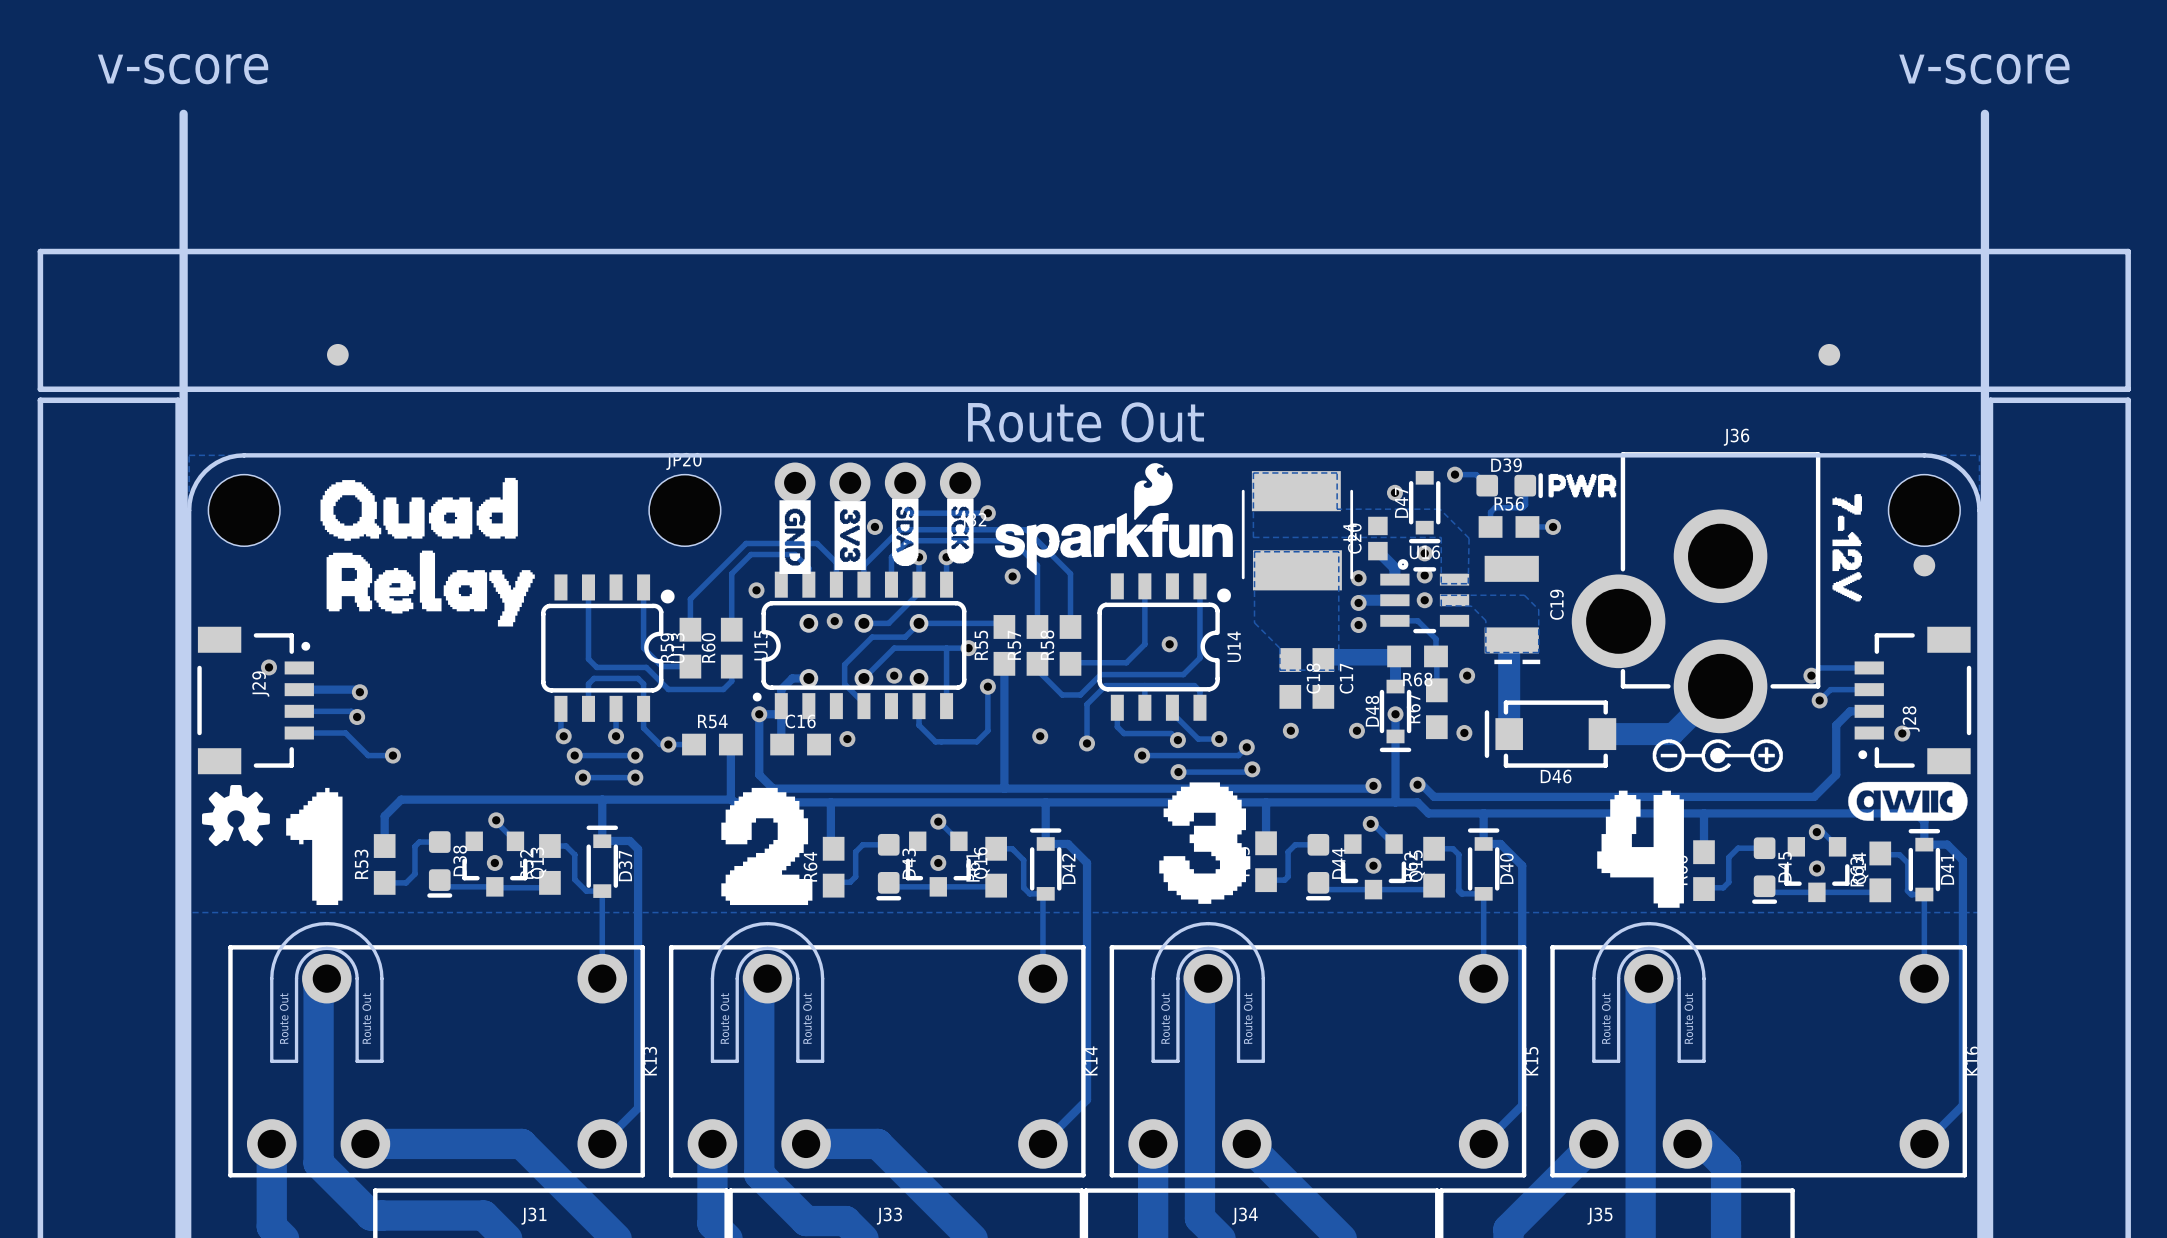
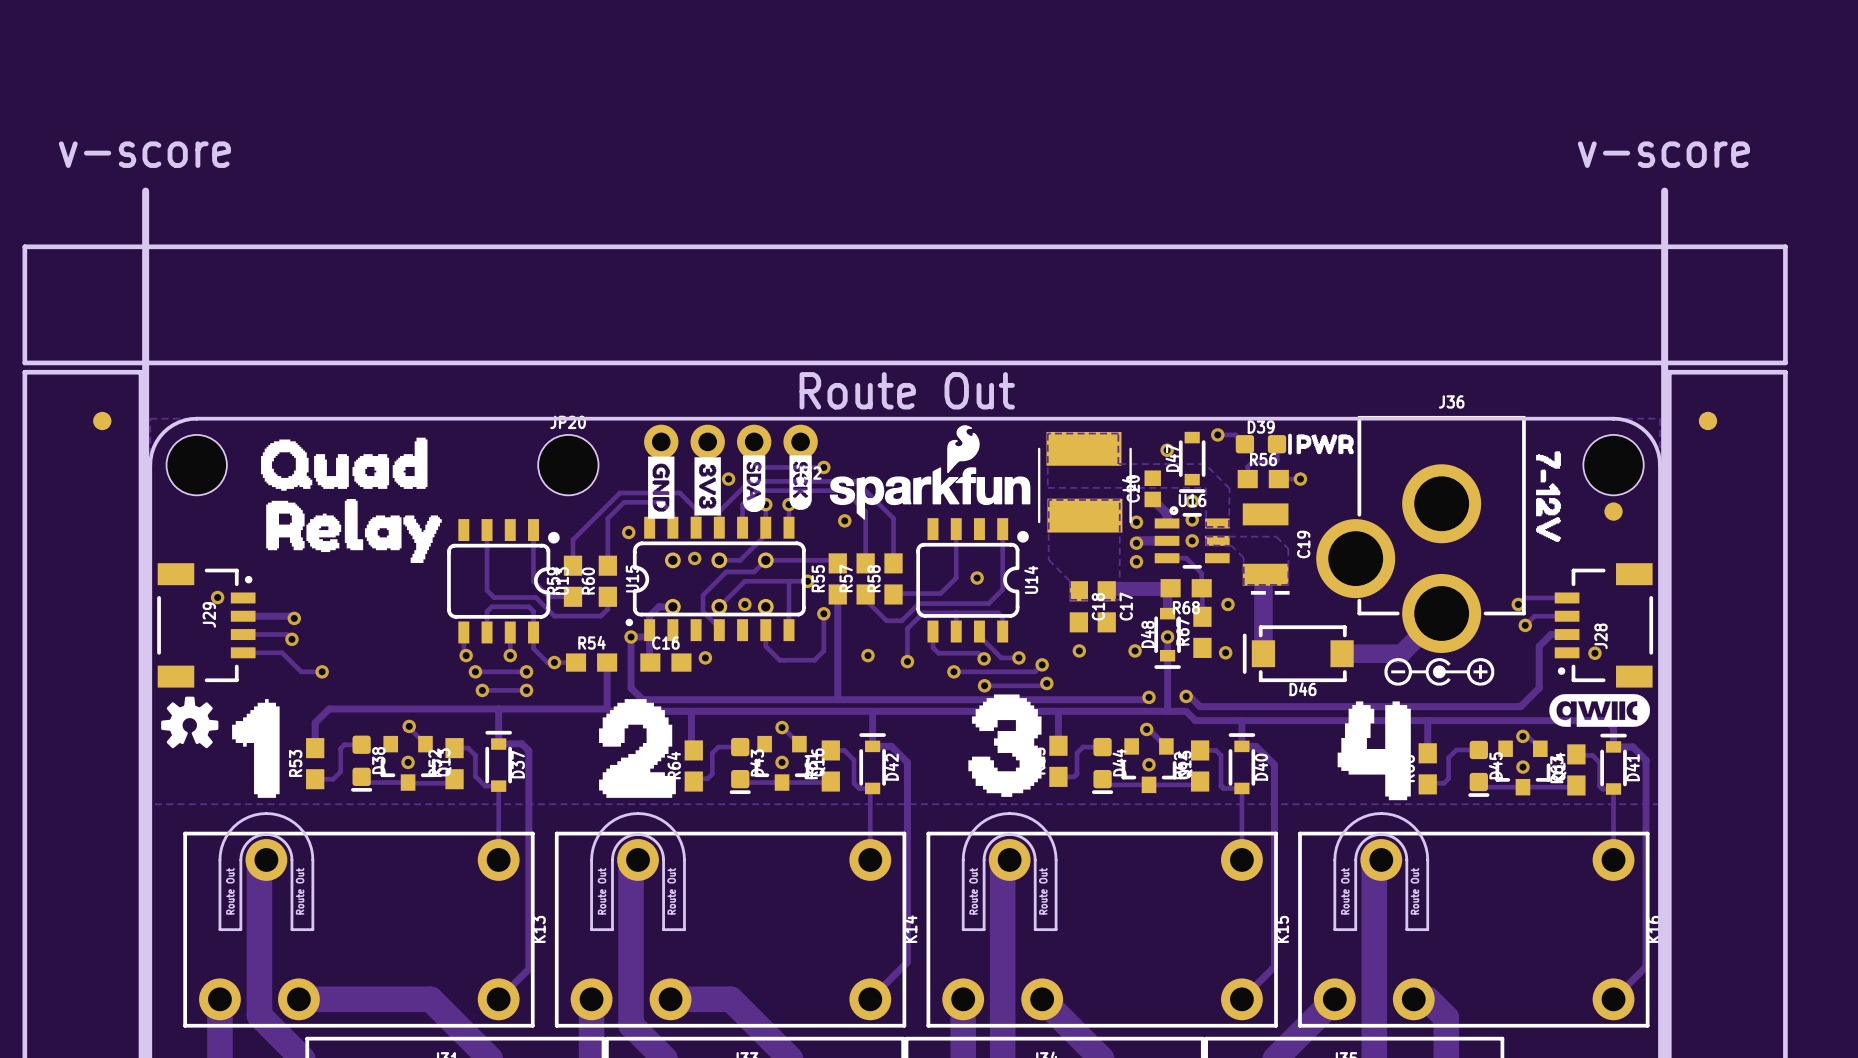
text position: v-score (183, 69) -> v-score (144, 154)
text position: v-score (1984, 69) -> v-score (1663, 154)
board edge: (183, 113) (183, 185) -> none
board edge: (1984, 113) (1984, 185) -> none
part position: (337, 354) -> (102, 420)
part position: (1829, 354) -> (1707, 420)

